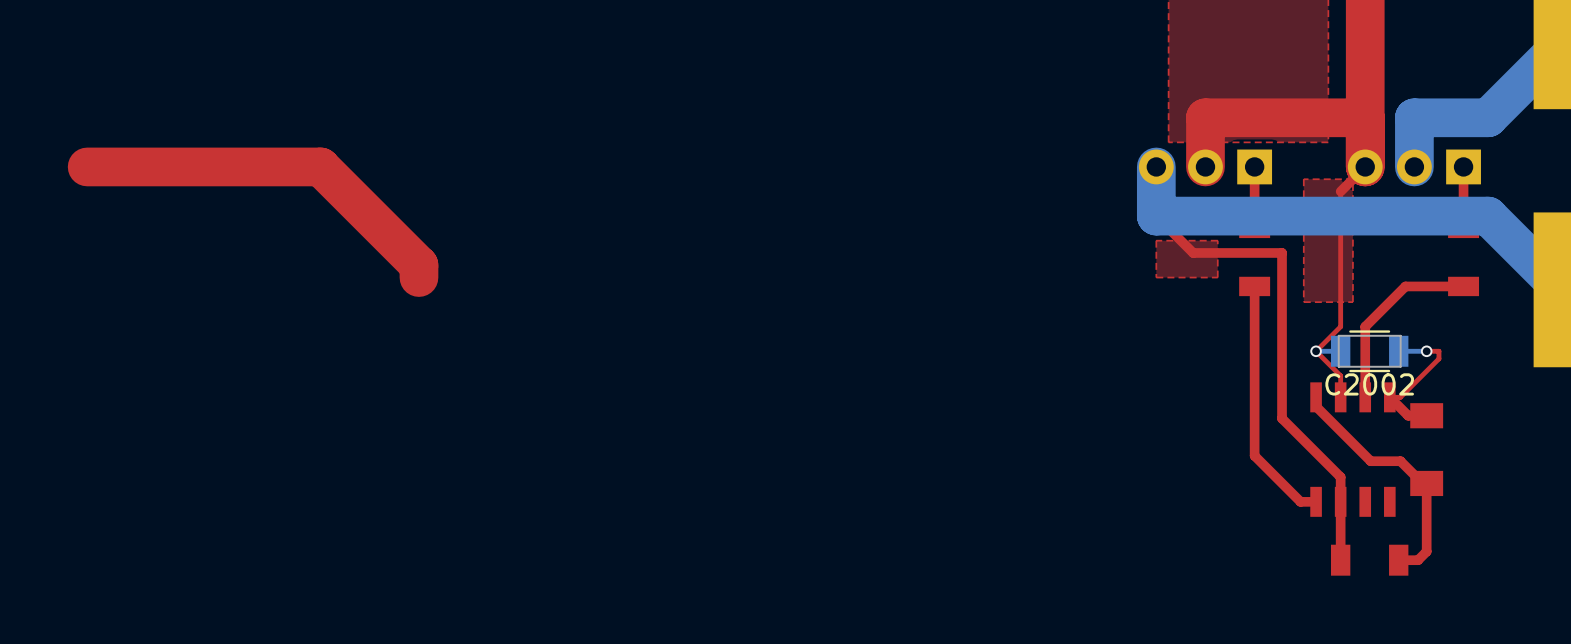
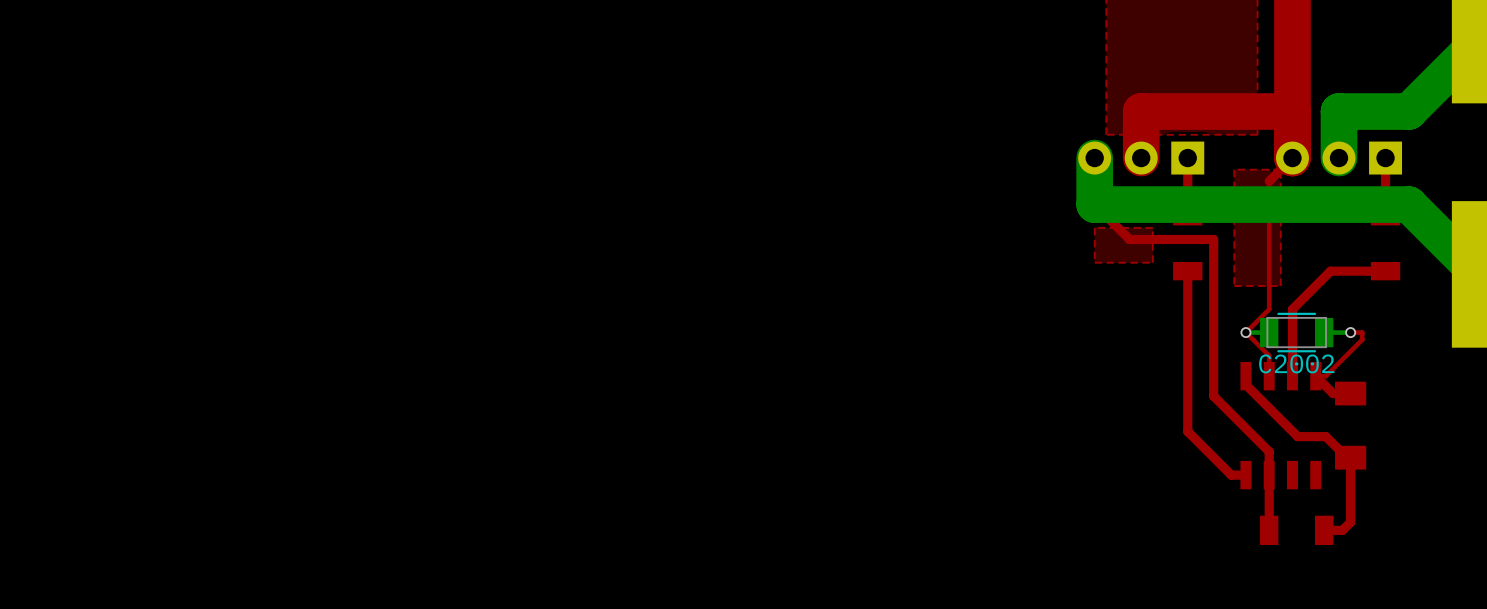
top track: (87, 166) (320, 166) (418, 265) (418, 277) -> none

